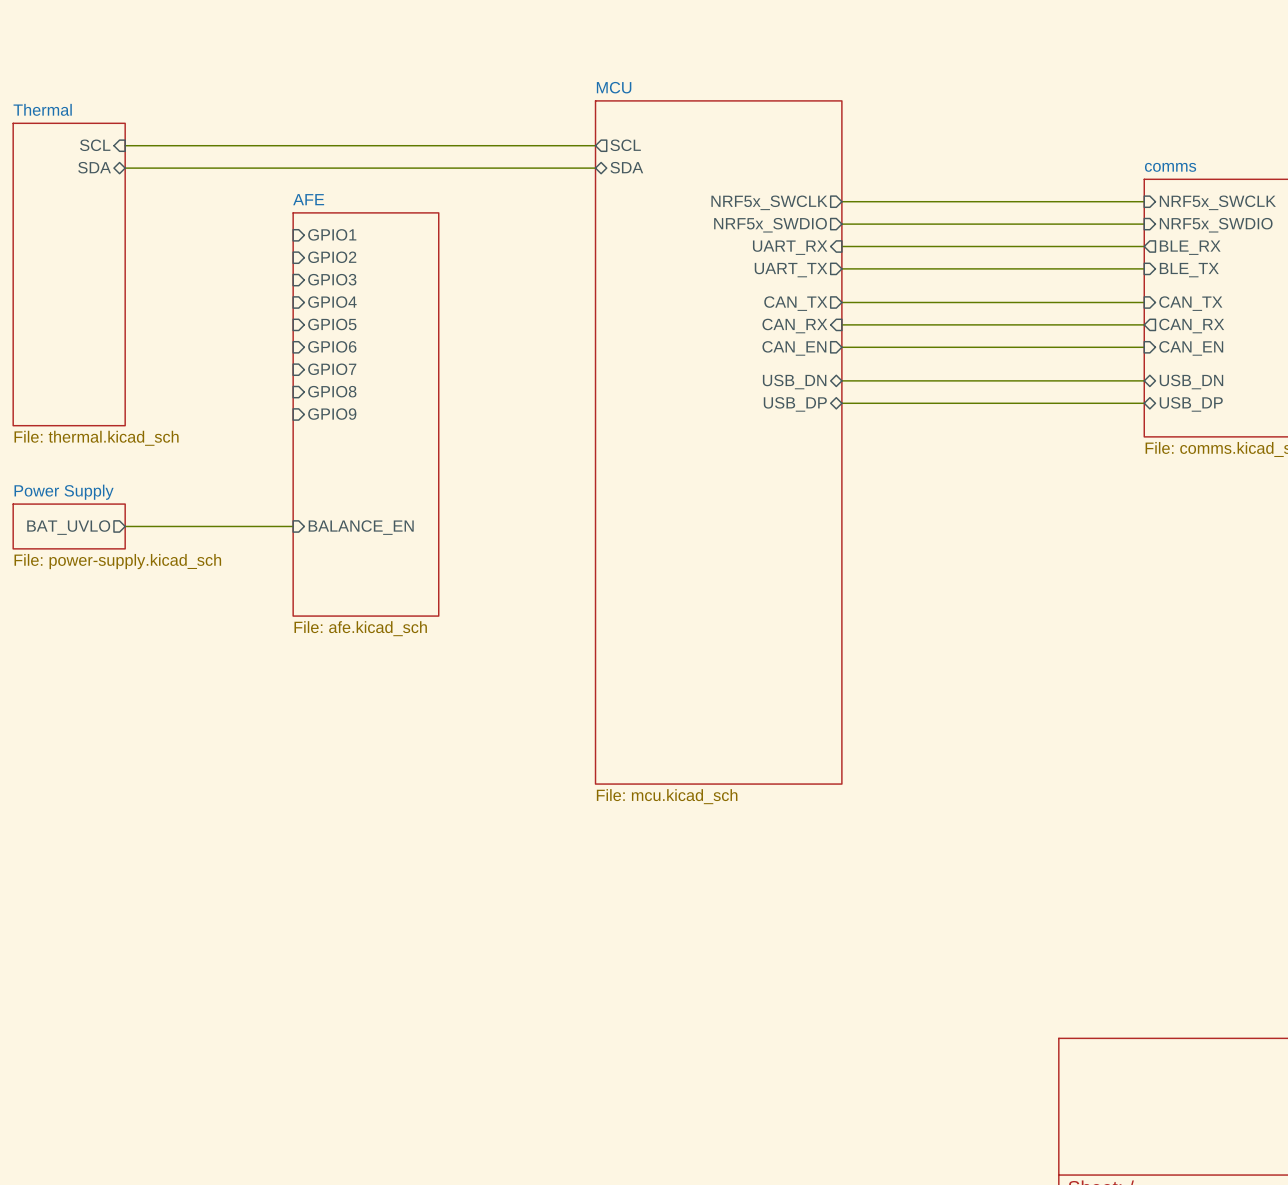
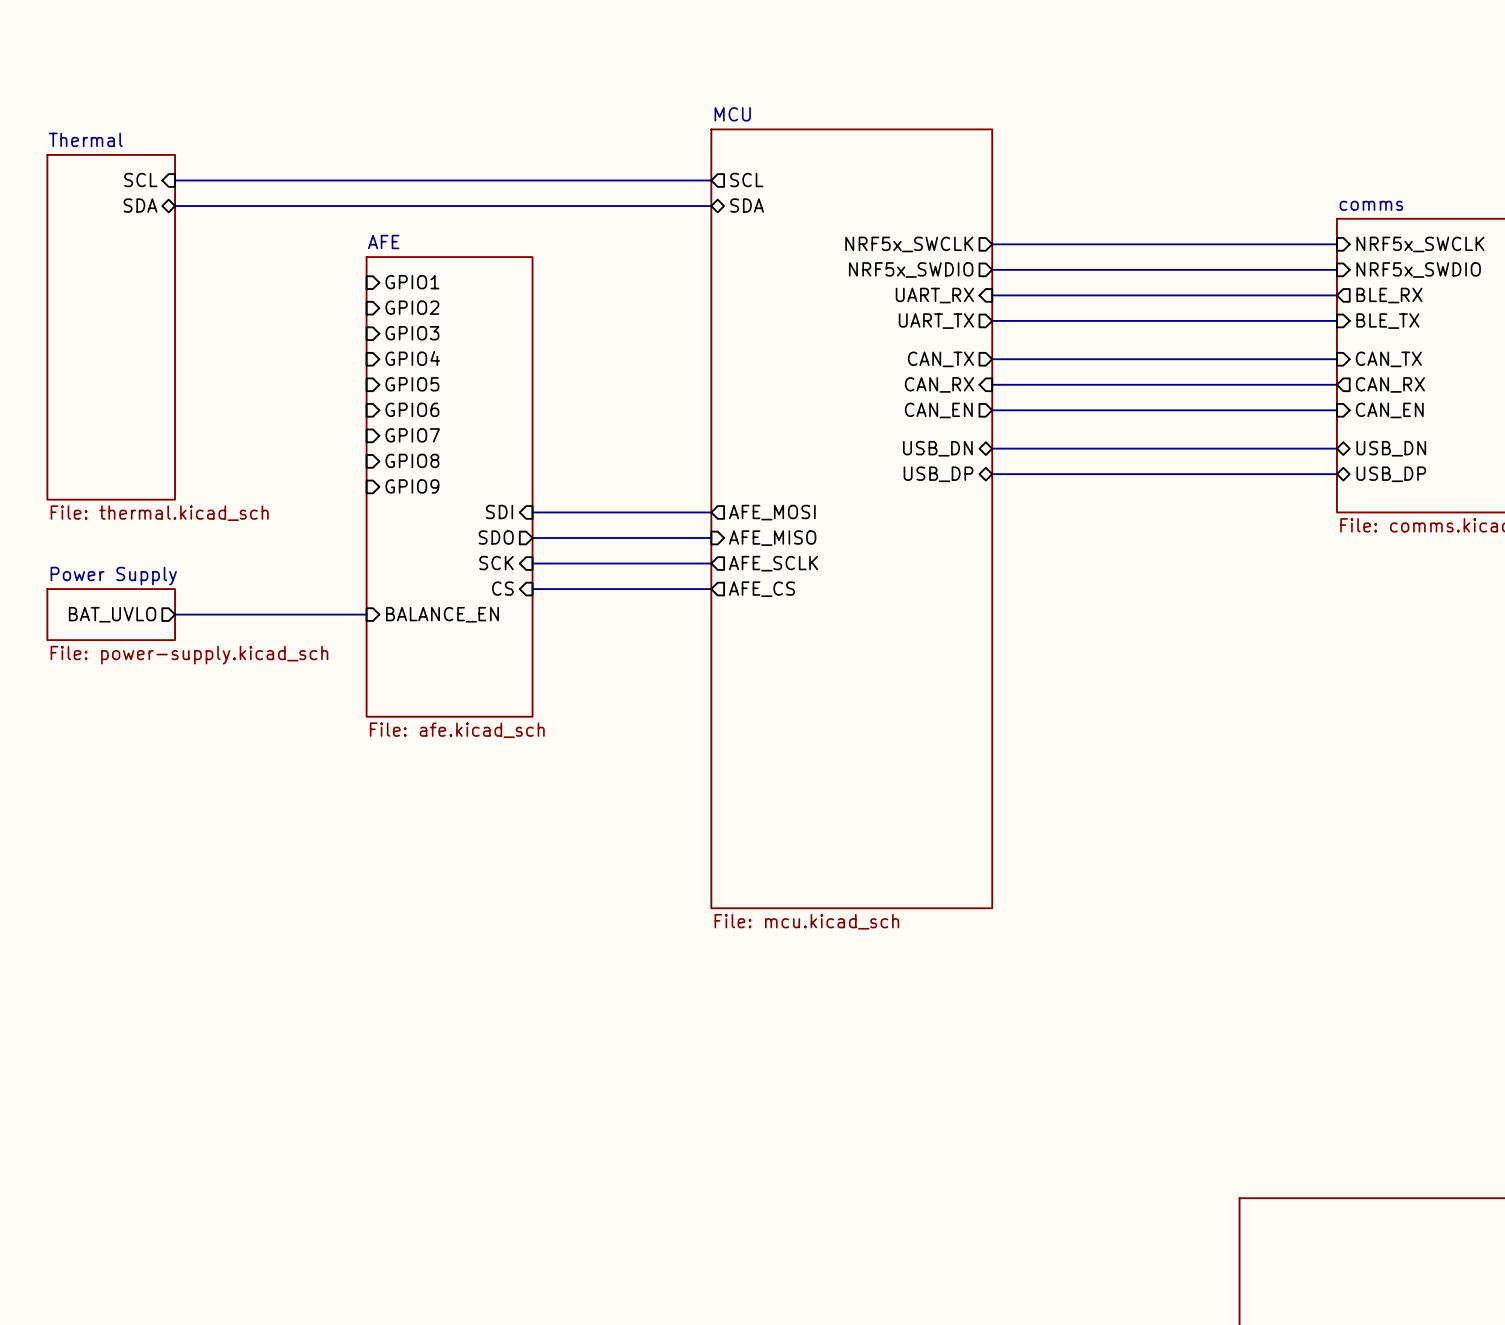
sheet pin: none -> SDI (499, 511)
wire: none -> (532, 512) (711, 512)
sheet pin: none -> AFE_MOSI (772, 512)
sheet pin: none -> SDO (496, 537)
wire: none -> (532, 537) (711, 537)
sheet pin: none -> AFE_MISO (772, 538)
sheet pin: none -> SCK (496, 563)
wire: none -> (532, 563) (711, 563)
sheet pin: none -> AFE_SCLK (773, 563)
sheet pin: none -> CS (502, 588)
wire: none -> (532, 589) (711, 589)
sheet pin: none -> AFE_CS (761, 589)

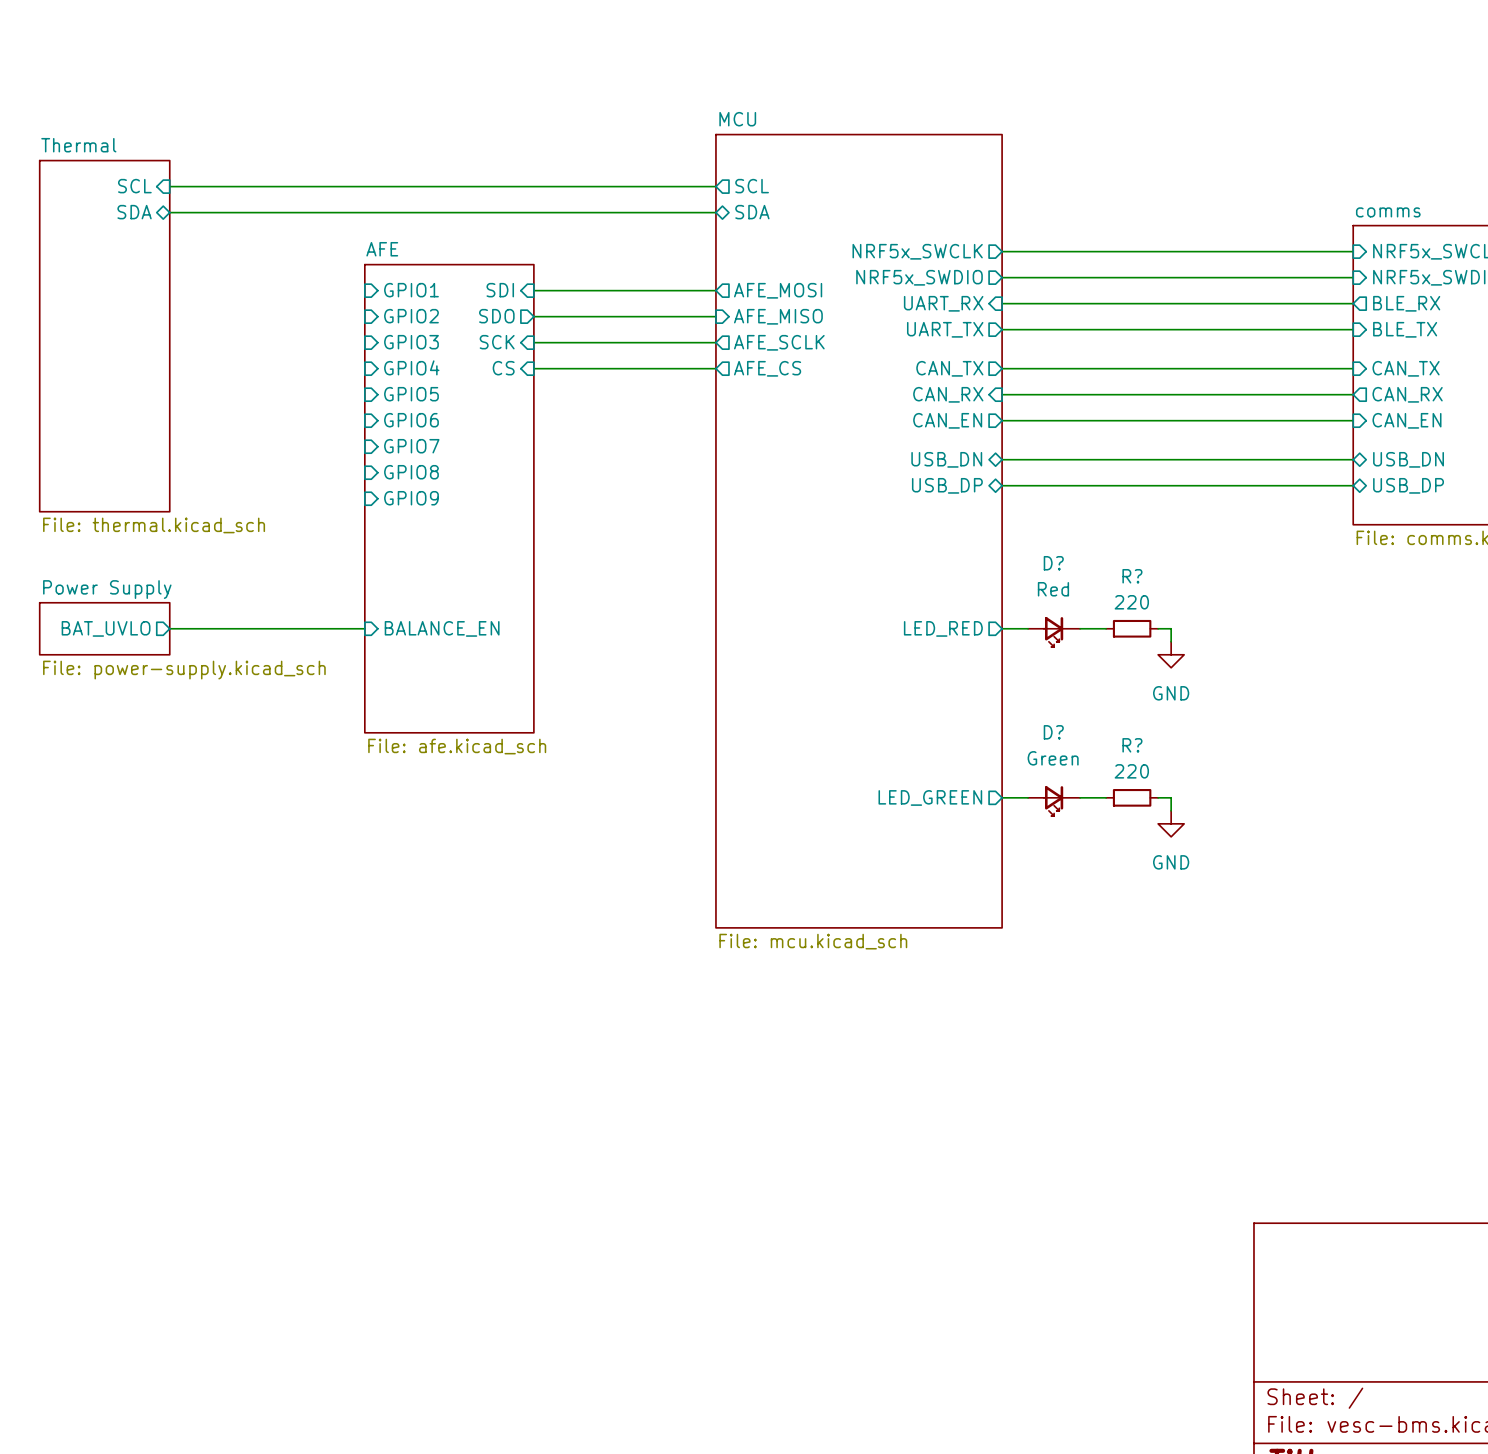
sheet pin position: SDI (499, 511) -> SDI (500, 290)
wire: (532, 512) (711, 512) -> (533, 290) (715, 290)
sheet pin position: AFE_MOSI (772, 512) -> AFE_MOSI (778, 290)
sheet pin position: SDO (496, 537) -> SDO (496, 316)
wire: (532, 537) (711, 537) -> (533, 316) (715, 316)
sheet pin position: AFE_MISO (772, 538) -> AFE_MISO (778, 316)
sheet pin position: SCK (496, 563) -> SCK (497, 342)
wire: (532, 563) (711, 563) -> (533, 342) (715, 342)
sheet pin position: AFE_SCLK (773, 563) -> AFE_SCLK (779, 342)
sheet pin position: CS (502, 588) -> CS (503, 368)
wire: (532, 589) (711, 589) -> (533, 368) (715, 368)
sheet pin position: AFE_CS (761, 589) -> AFE_CS (767, 368)
sheet pin: none -> LED_RED (943, 628)
wire: none -> (1002, 628) (1028, 628)
wire: none -> (1080, 628) (1106, 628)
R?: none -> 220 (1132, 628)
wire: none -> (1158, 628) (1171, 628) (1171, 641)
D?: none -> Red (1054, 632)
power symbol: none -> GND (1171, 654)
sheet pin: none -> LED_GREEN (930, 797)
wire: none -> (1002, 797) (1028, 797)
wire: none -> (1080, 797) (1106, 797)
R?: none -> 220 (1132, 797)
wire: none -> (1158, 797) (1171, 797) (1171, 810)
D?: none -> Green (1054, 801)
power symbol: none -> GND (1171, 823)

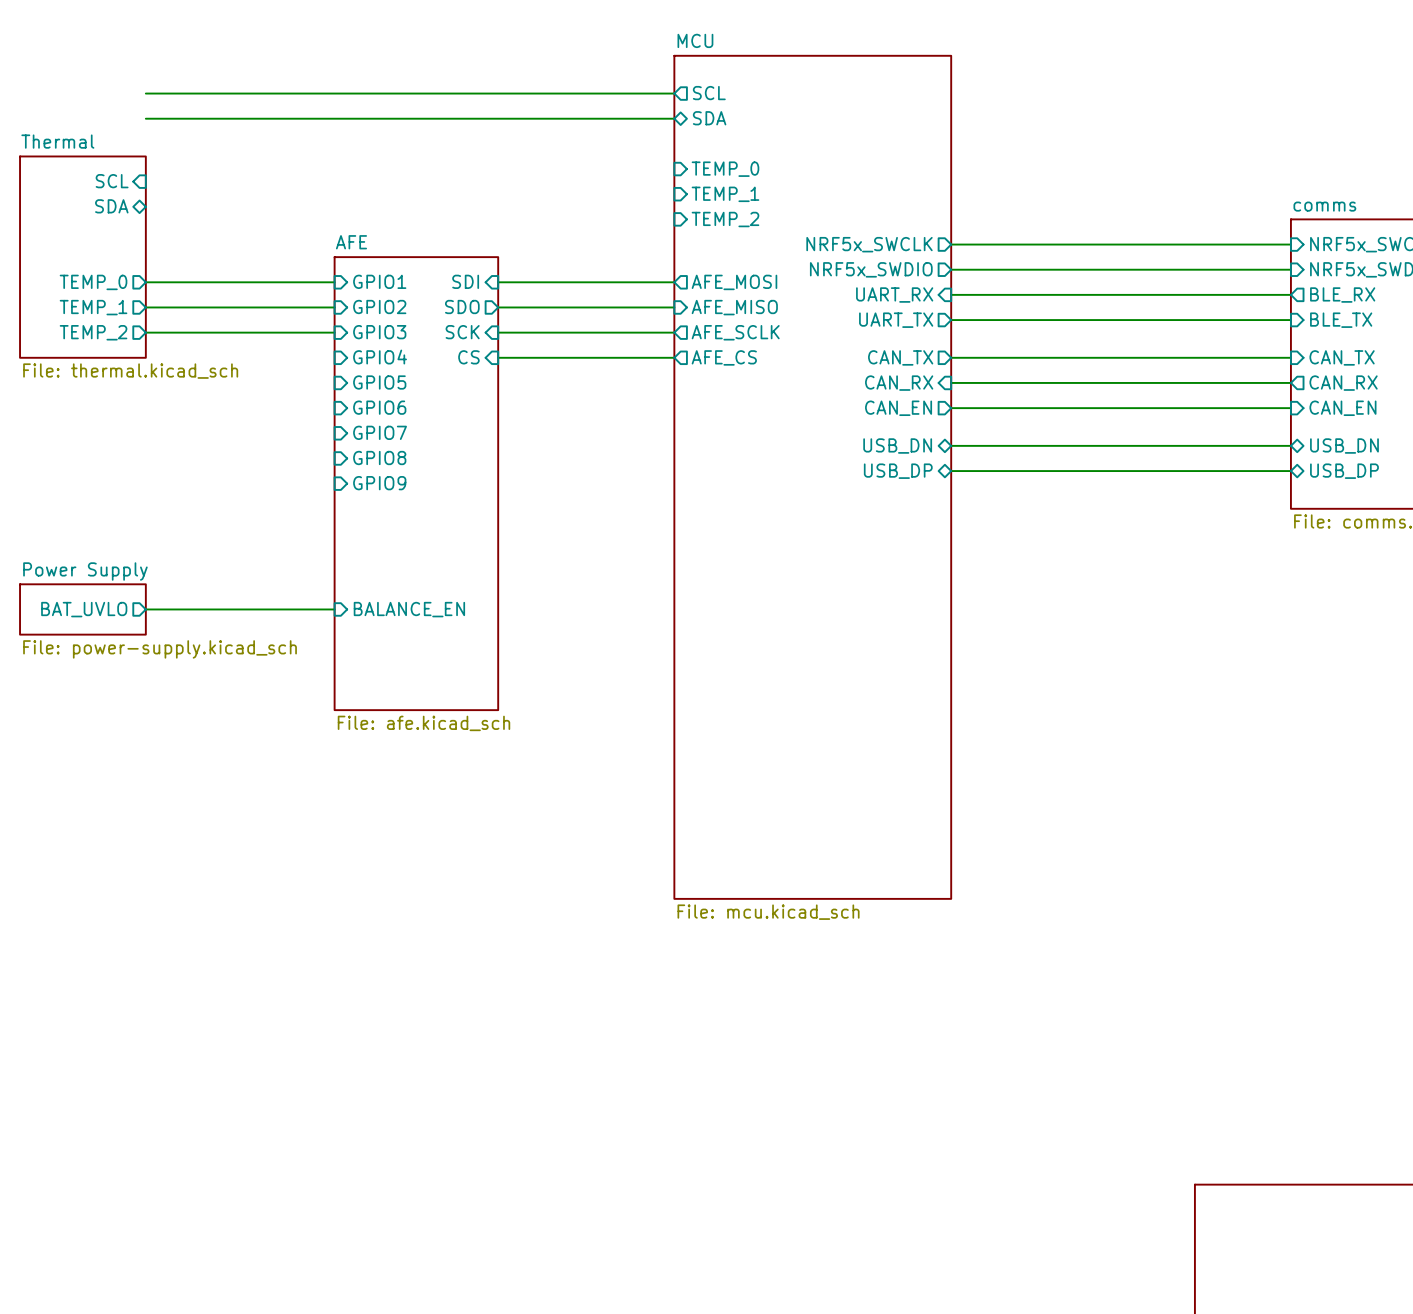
sheet pin: none -> TEMP_0 (725, 169)
wire: (169, 186) (715, 186) -> (145, 93) (674, 93)
sheet pin position: SCL (752, 186) -> SCL (709, 93)
sheet pin: none -> TEMP_1 (725, 194)
wire: (169, 212) (715, 212) -> (145, 118) (674, 118)
sheet pin position: SDA (752, 212) -> SDA (709, 118)
sheet pin: none -> TEMP_2 (725, 219)
sheet Thermal: none -> File: thermal.kicad_sch (82, 257)
sheet pin: none -> TEMP_0 (93, 282)
wire: none -> (145, 282) (334, 282)
sheet pin: none -> TEMP_1 (93, 307)
wire: none -> (145, 307) (334, 307)
sheet Thermal: File: thermal.kicad_sch (104, 336) -> none
sheet pin: none -> TEMP_2 (93, 332)
wire: none -> (145, 332) (334, 332)
sheet MCU: none -> File: mcu.kicad_sch (812, 477)
sheet MCU: File: mcu.kicad_sch (859, 531) -> none
sheet pin: LED_RED (943, 628) -> none
wire: (1002, 628) (1028, 628) -> none
wire: (1080, 628) (1106, 628) -> none
R?: 220 (1132, 628) -> none
wire: (1158, 628) (1171, 628) (1171, 641) -> none
D?: Red (1054, 632) -> none
power symbol: GND (1171, 654) -> none
sheet pin: LED_GREEN (930, 797) -> none
wire: (1002, 797) (1028, 797) -> none
wire: (1080, 797) (1106, 797) -> none
R?: 220 (1132, 797) -> none
wire: (1158, 797) (1171, 797) (1171, 810) -> none
D?: Green (1054, 801) -> none
power symbol: GND (1171, 823) -> none

